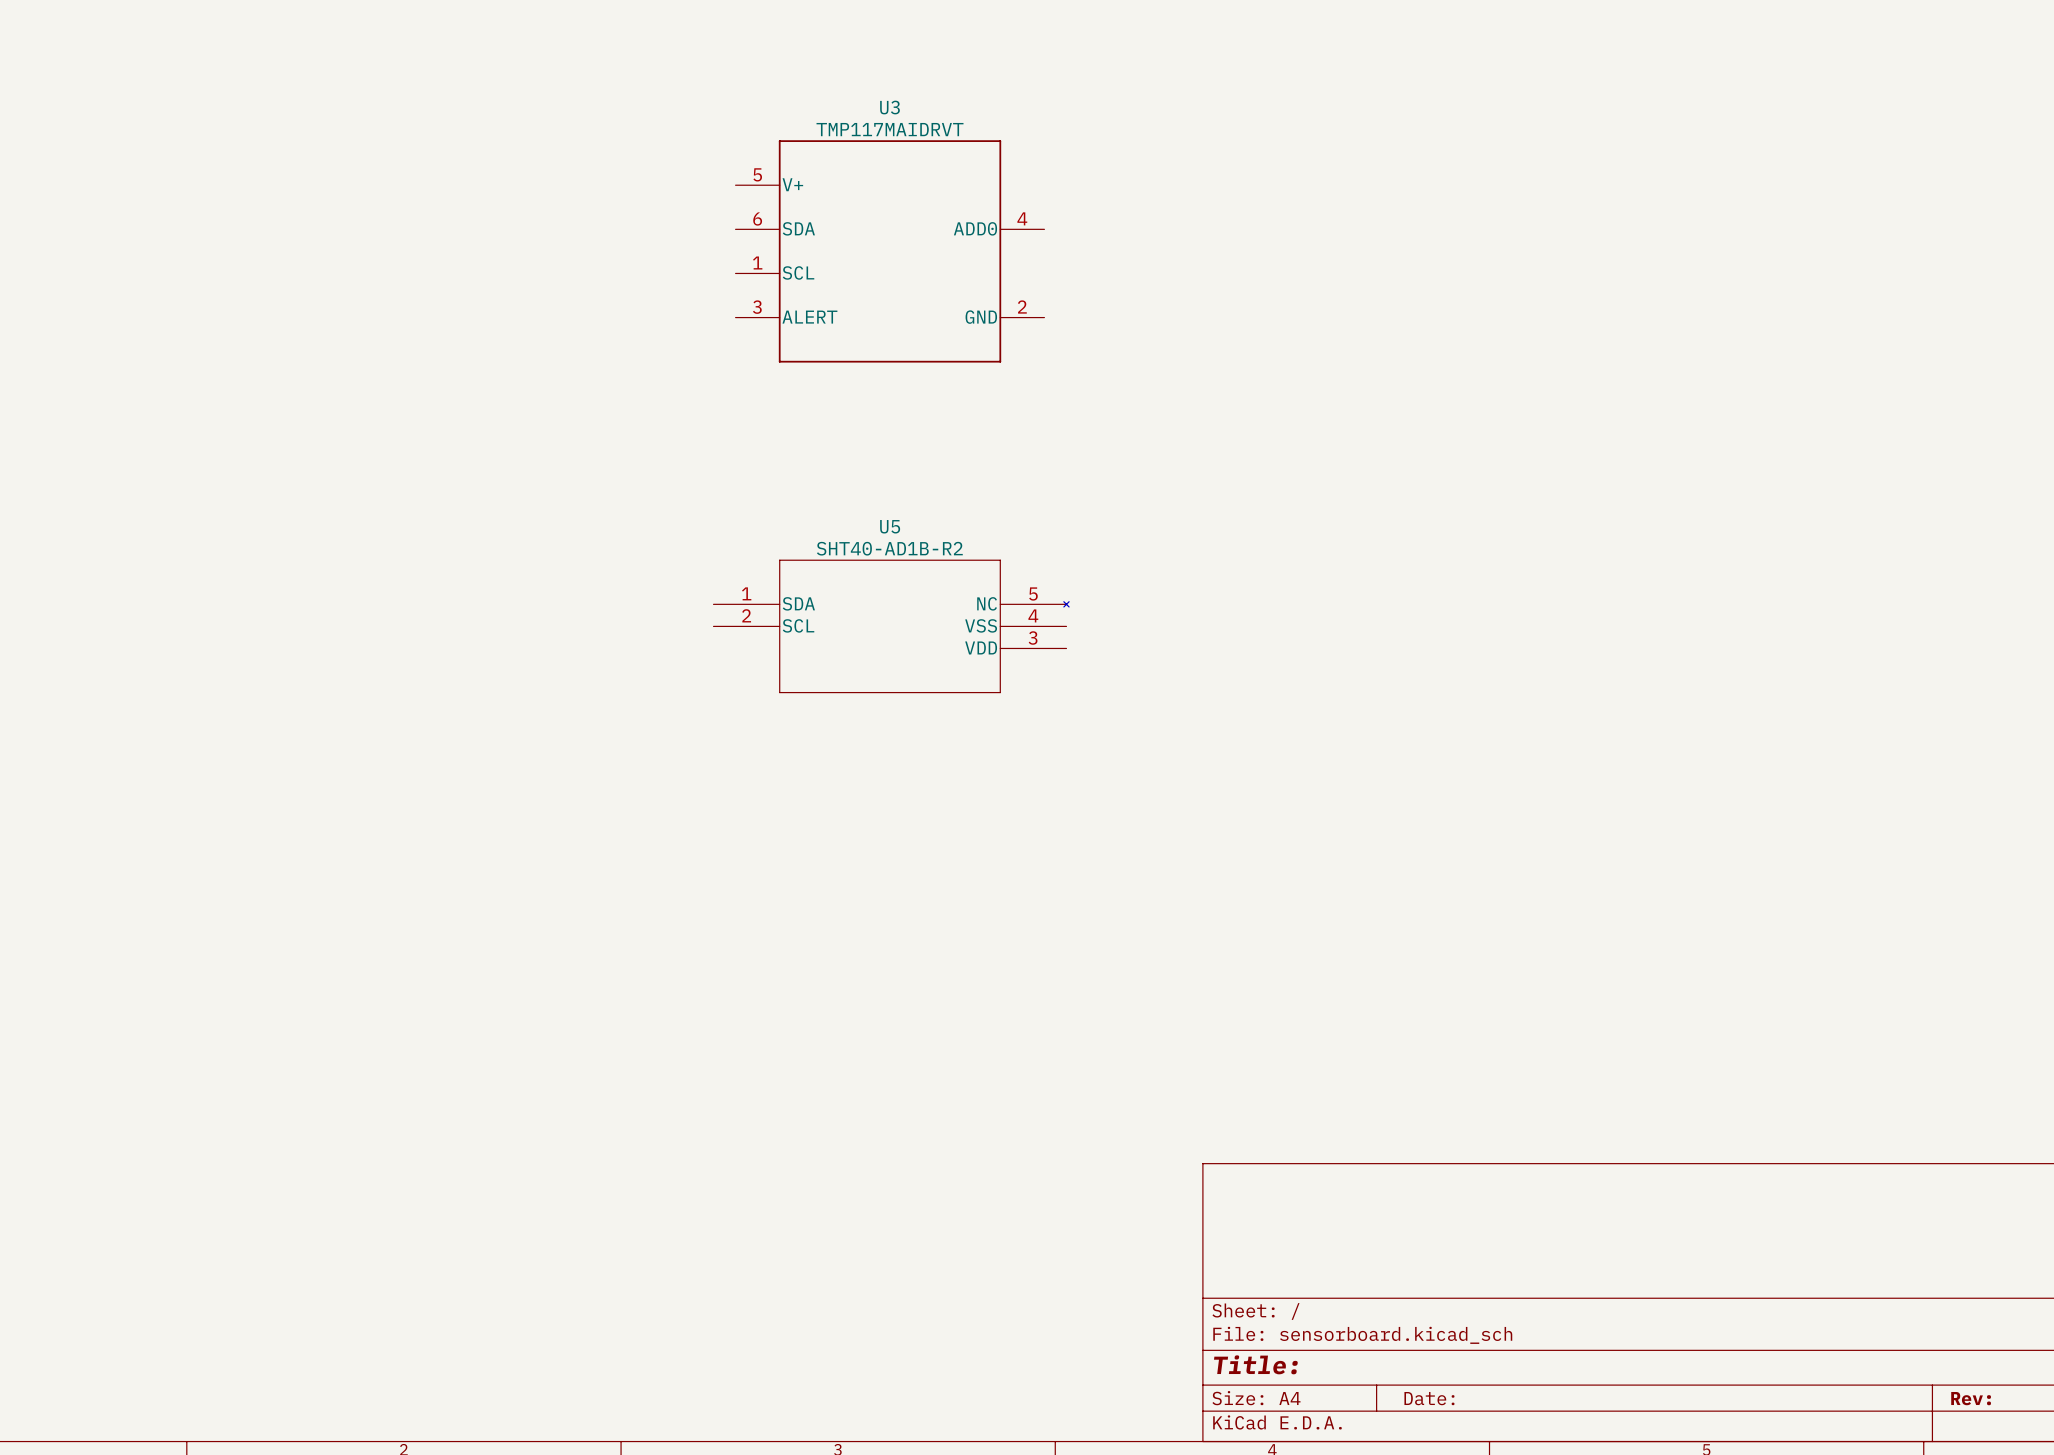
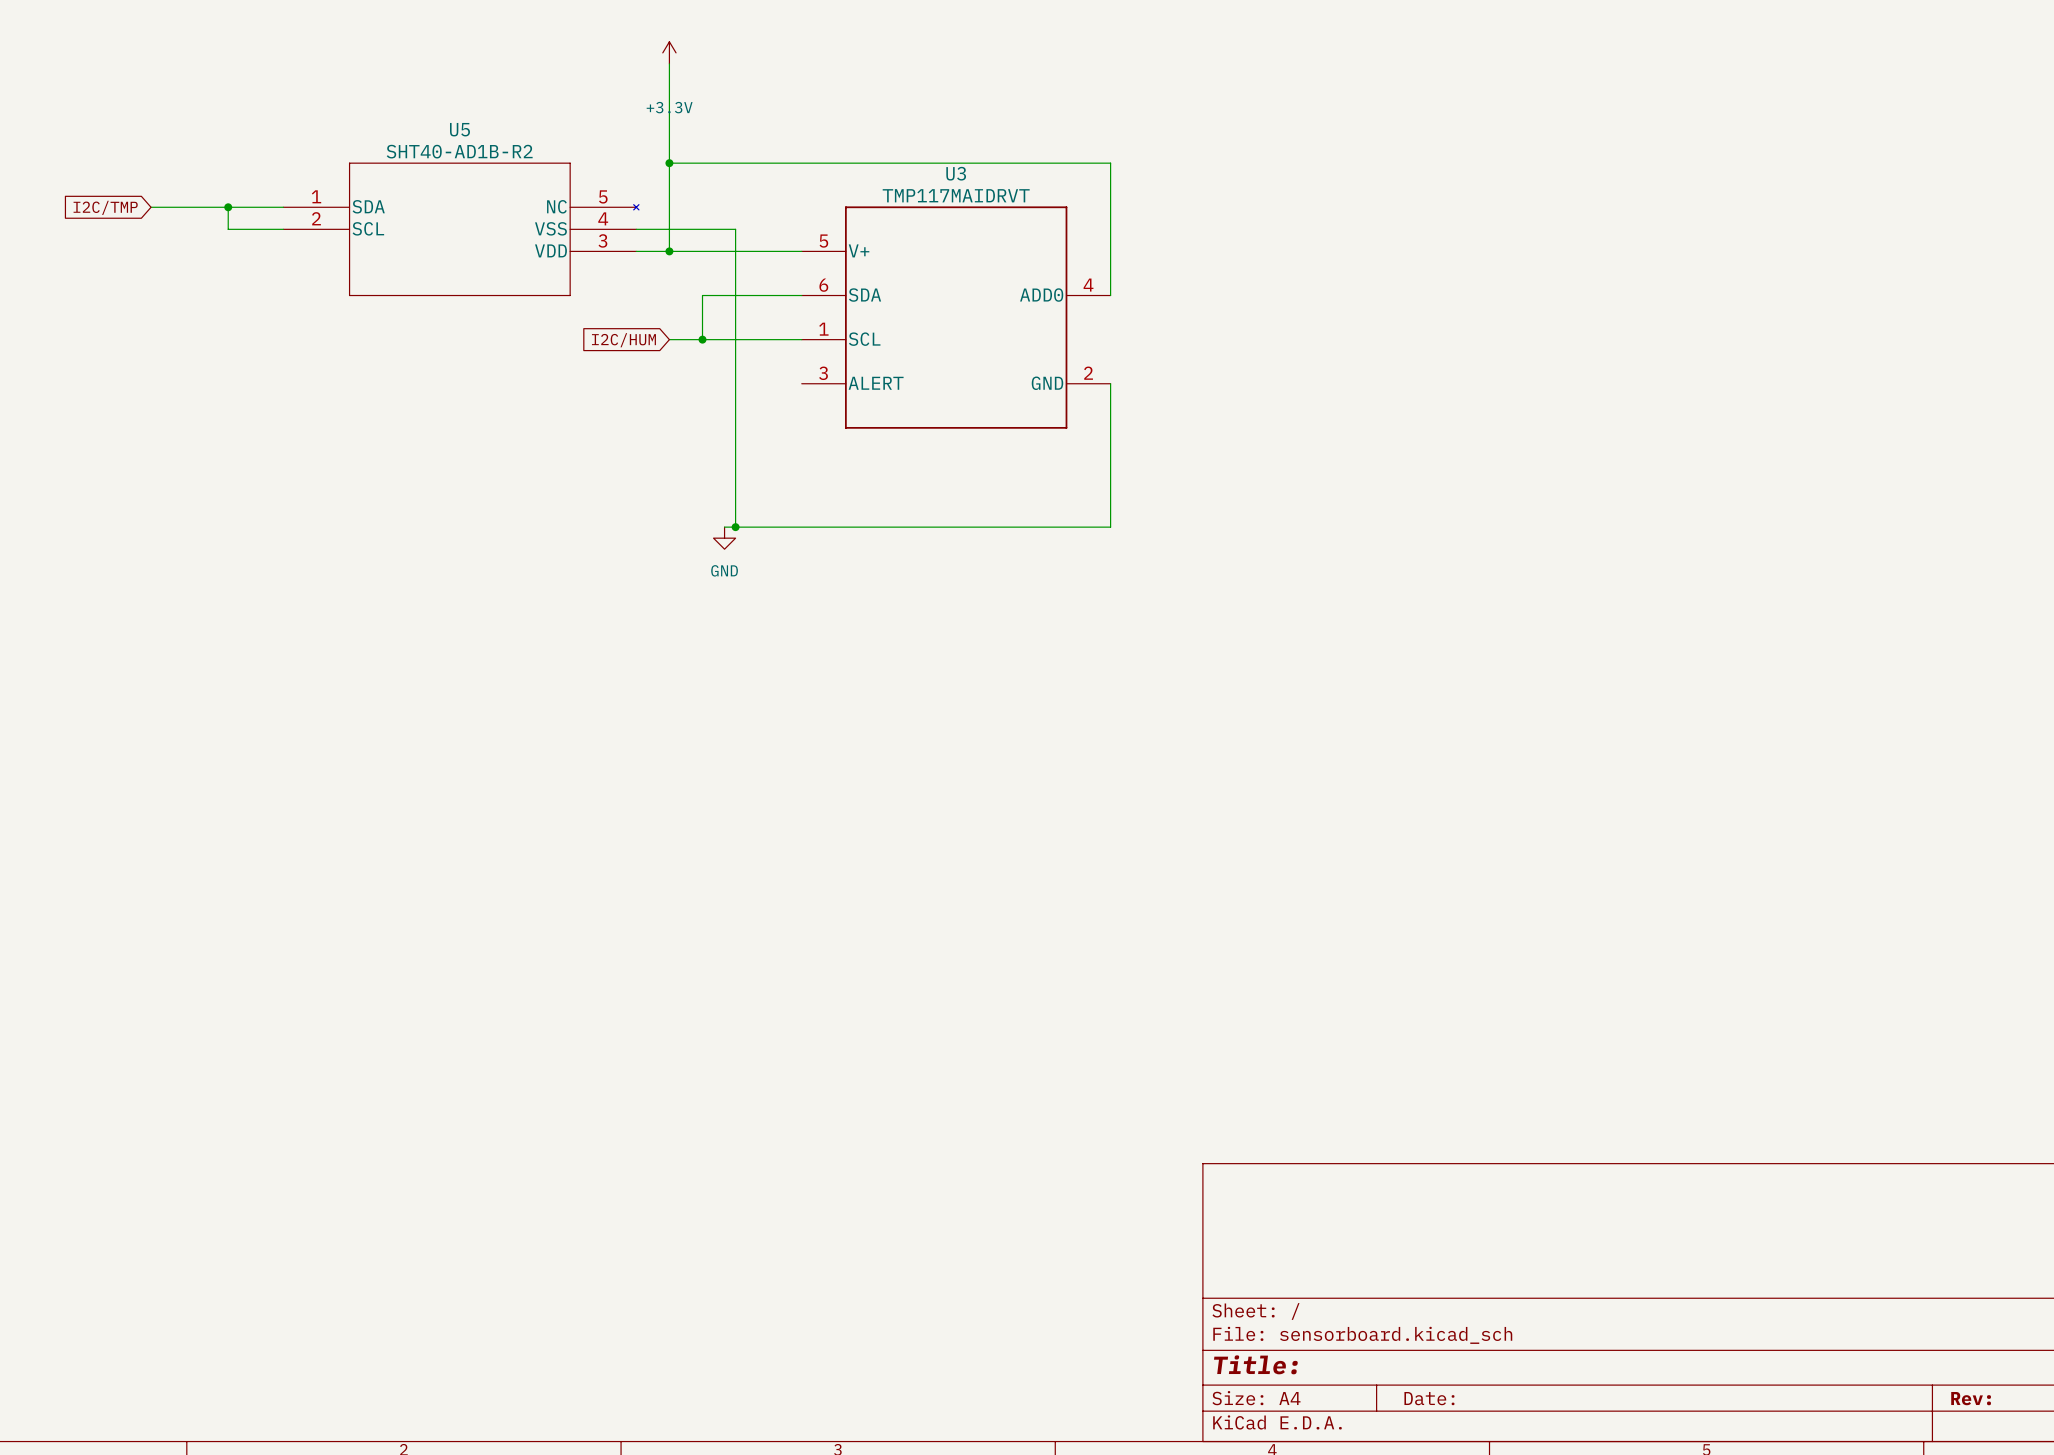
power symbol: none -> +3.3V (669, 52)
wire: none -> (669, 63) (669, 251)
wire: none -> (669, 163) (1110, 163) (1110, 295)
junction: none -> (669, 163)
global label: none -> I2C/TMP (105, 207)
wire: none -> (151, 207) (283, 207)
wire: none -> (228, 207) (228, 229) (283, 229)
junction: none -> (228, 207)
wire: none -> (636, 229) (735, 229) (735, 527)
wire: none -> (636, 251) (801, 251)
junction: none -> (669, 251)
U3 position: (890, 251) -> (956, 317)
wire: none -> (801, 295) (702, 295) (702, 339)
wire: none -> (669, 339) (801, 339)
junction: none -> (702, 339)
global label: none -> I2C/HUM (623, 340)
wire: none -> (1110, 383) (1110, 527) (724, 527)
junction: none -> (735, 527)
power symbol: none -> GND (724, 538)
U5 position: (891, 626) -> (461, 229)

